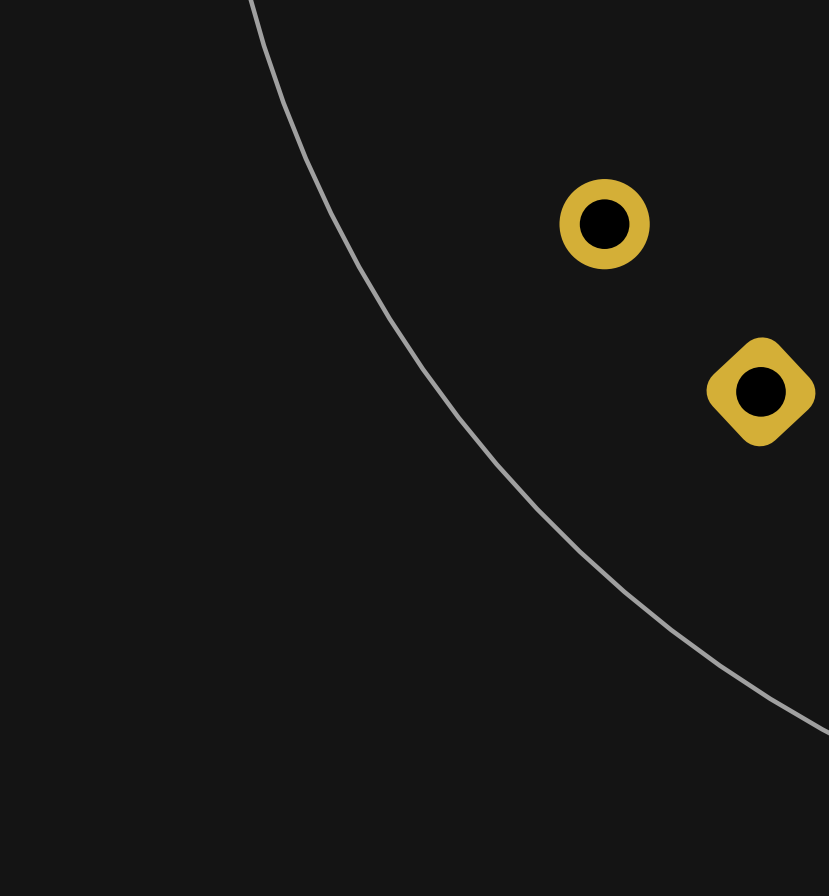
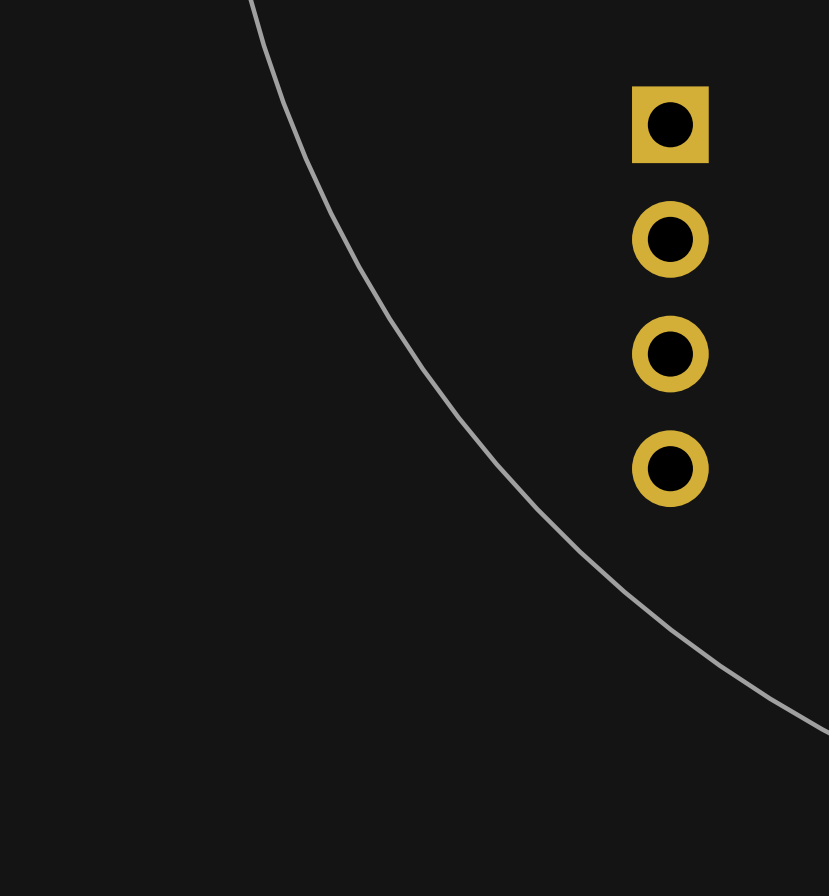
part footprint: [559, 179, 816, 447] -> [632, 86, 709, 508]

